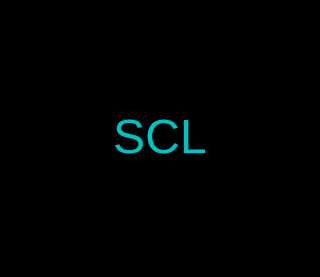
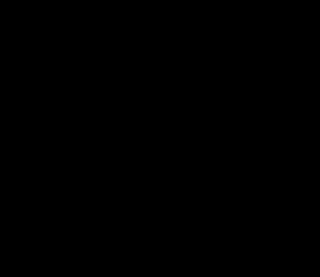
drawing: [115, 119, 206, 154] -> none

